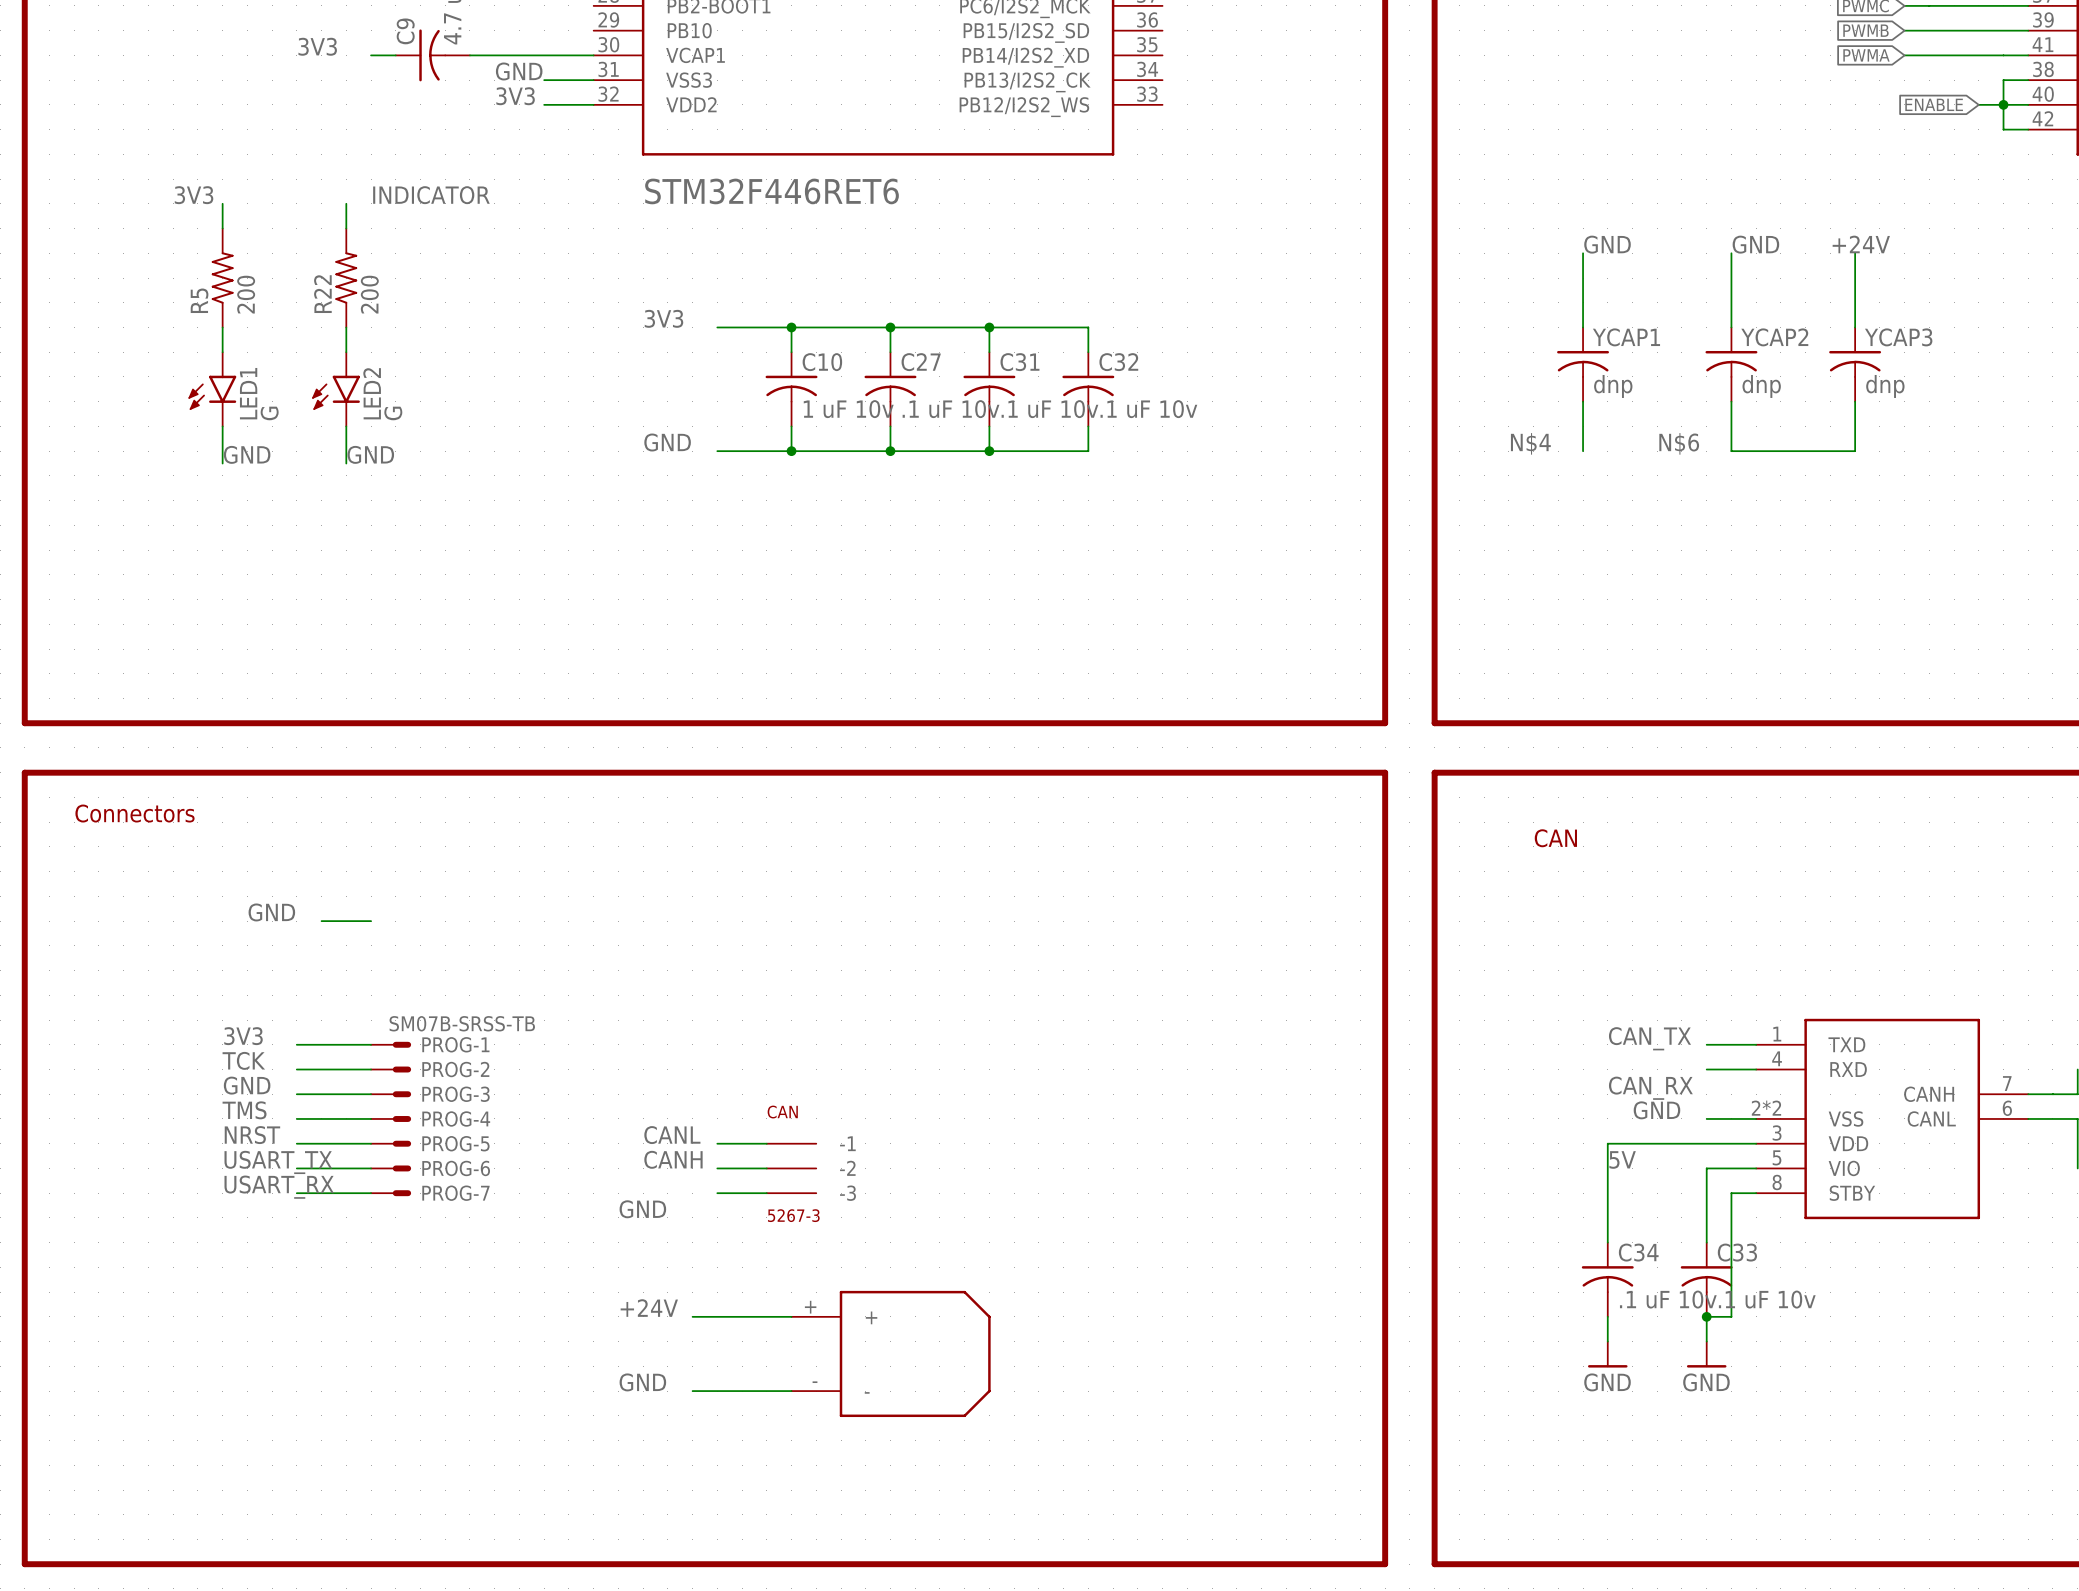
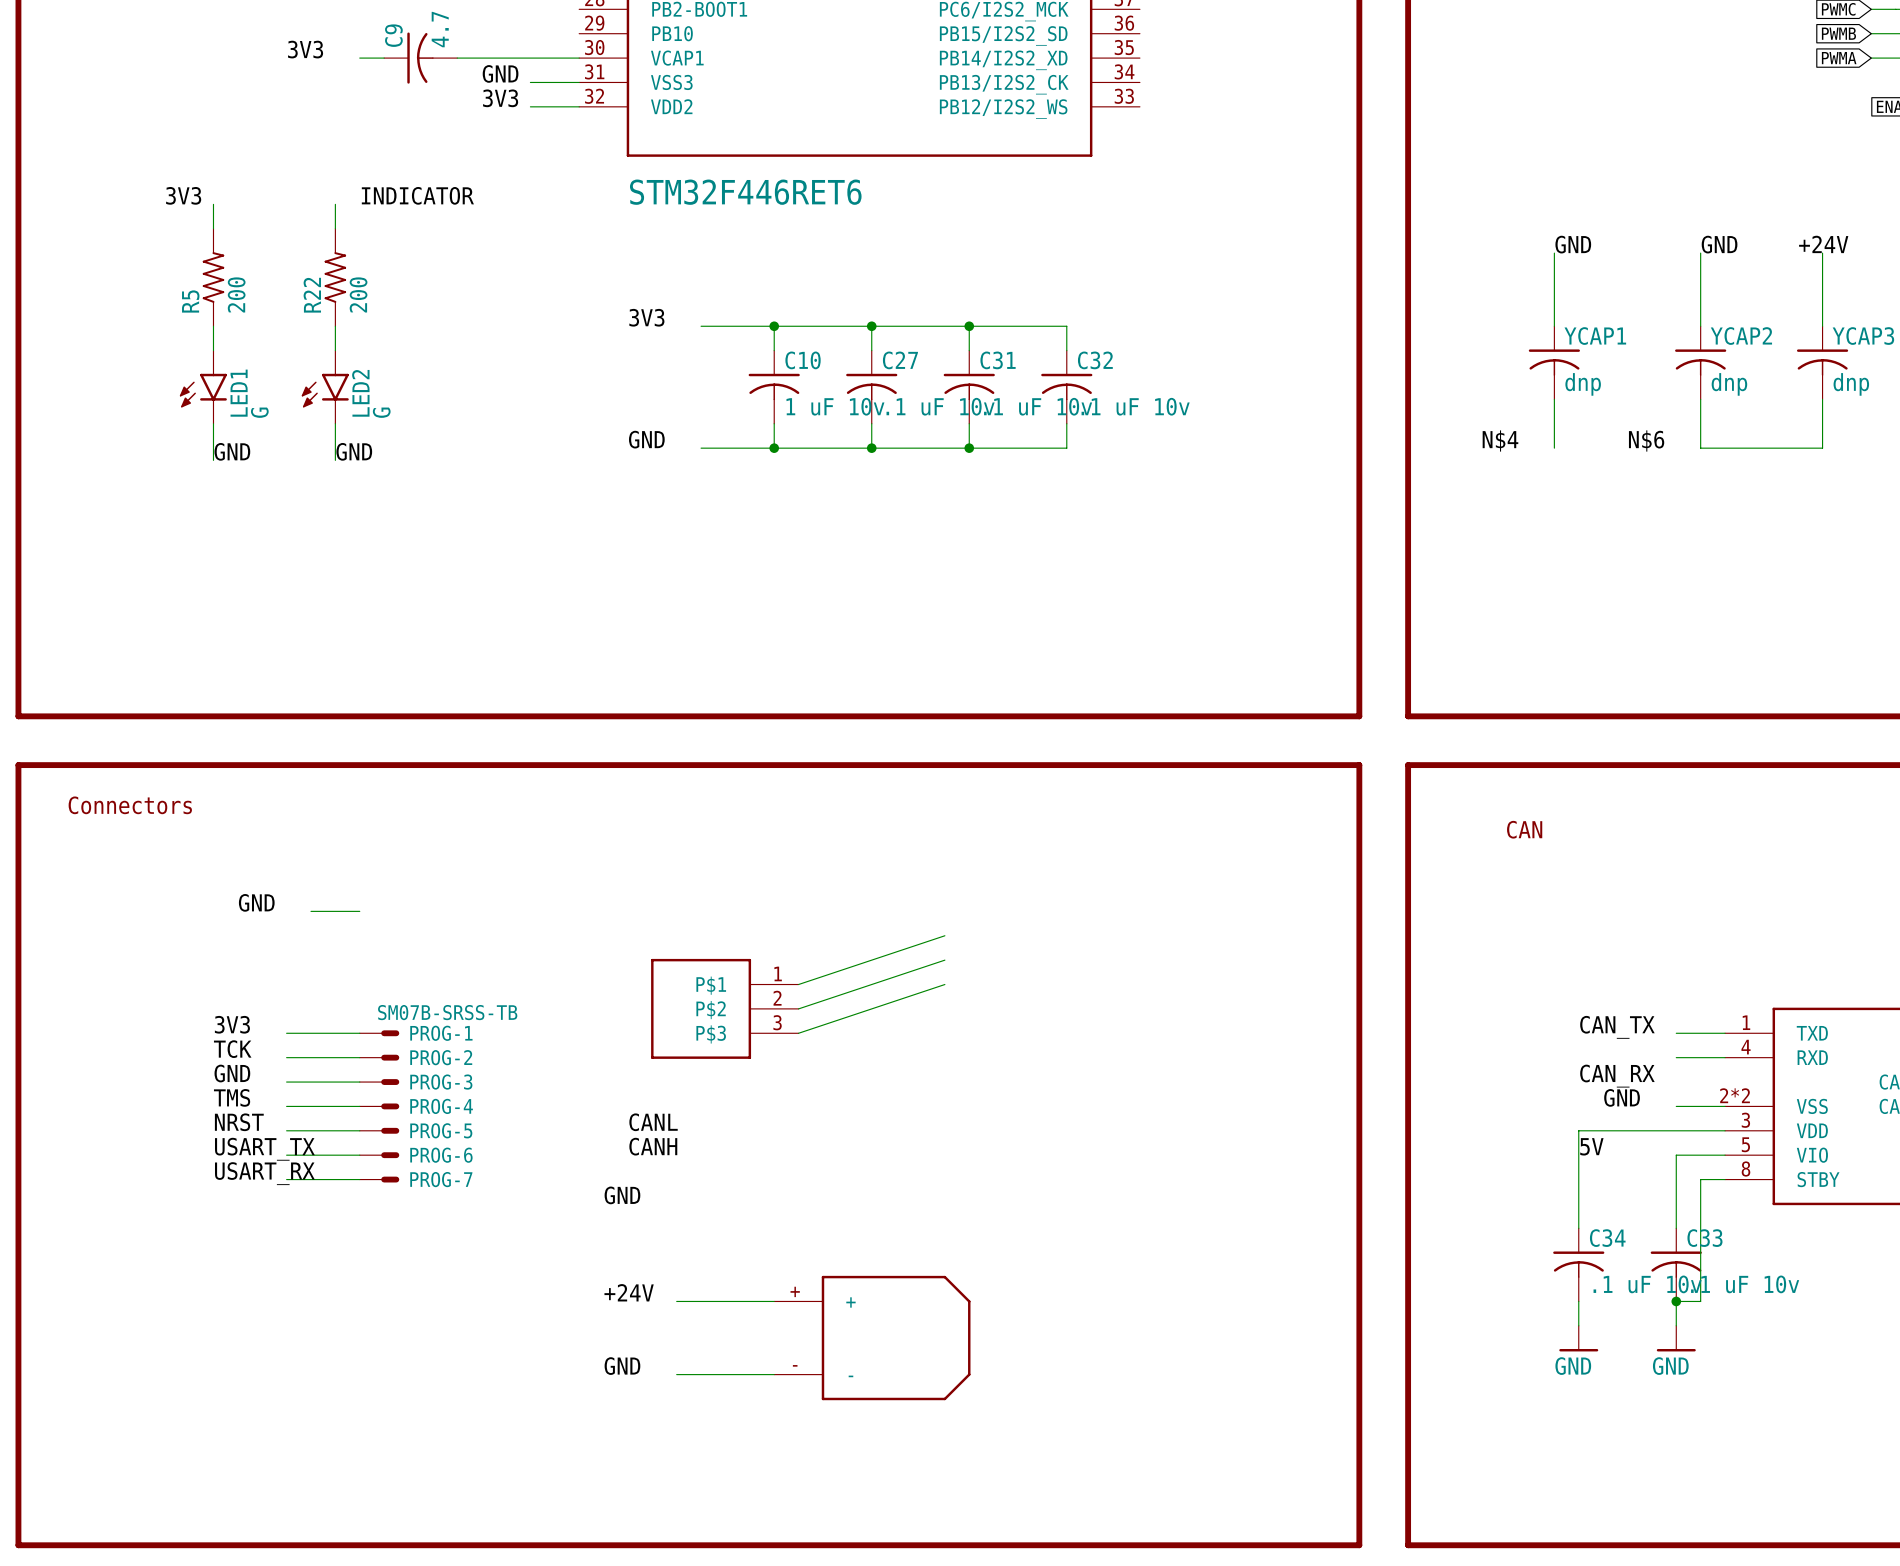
wire: none -> (944, 935) (798, 984)
wire: none -> (944, 960) (798, 1008)
wire: none -> (944, 984) (798, 1033)
part: none -> (724, 1008)
wire: (717, 1143) (766, 1143) -> none
wire: (717, 1168) (766, 1168) -> none
CAN: 5267-3 (791, 1168) -> none
wire: (717, 1193) (766, 1193) -> none

